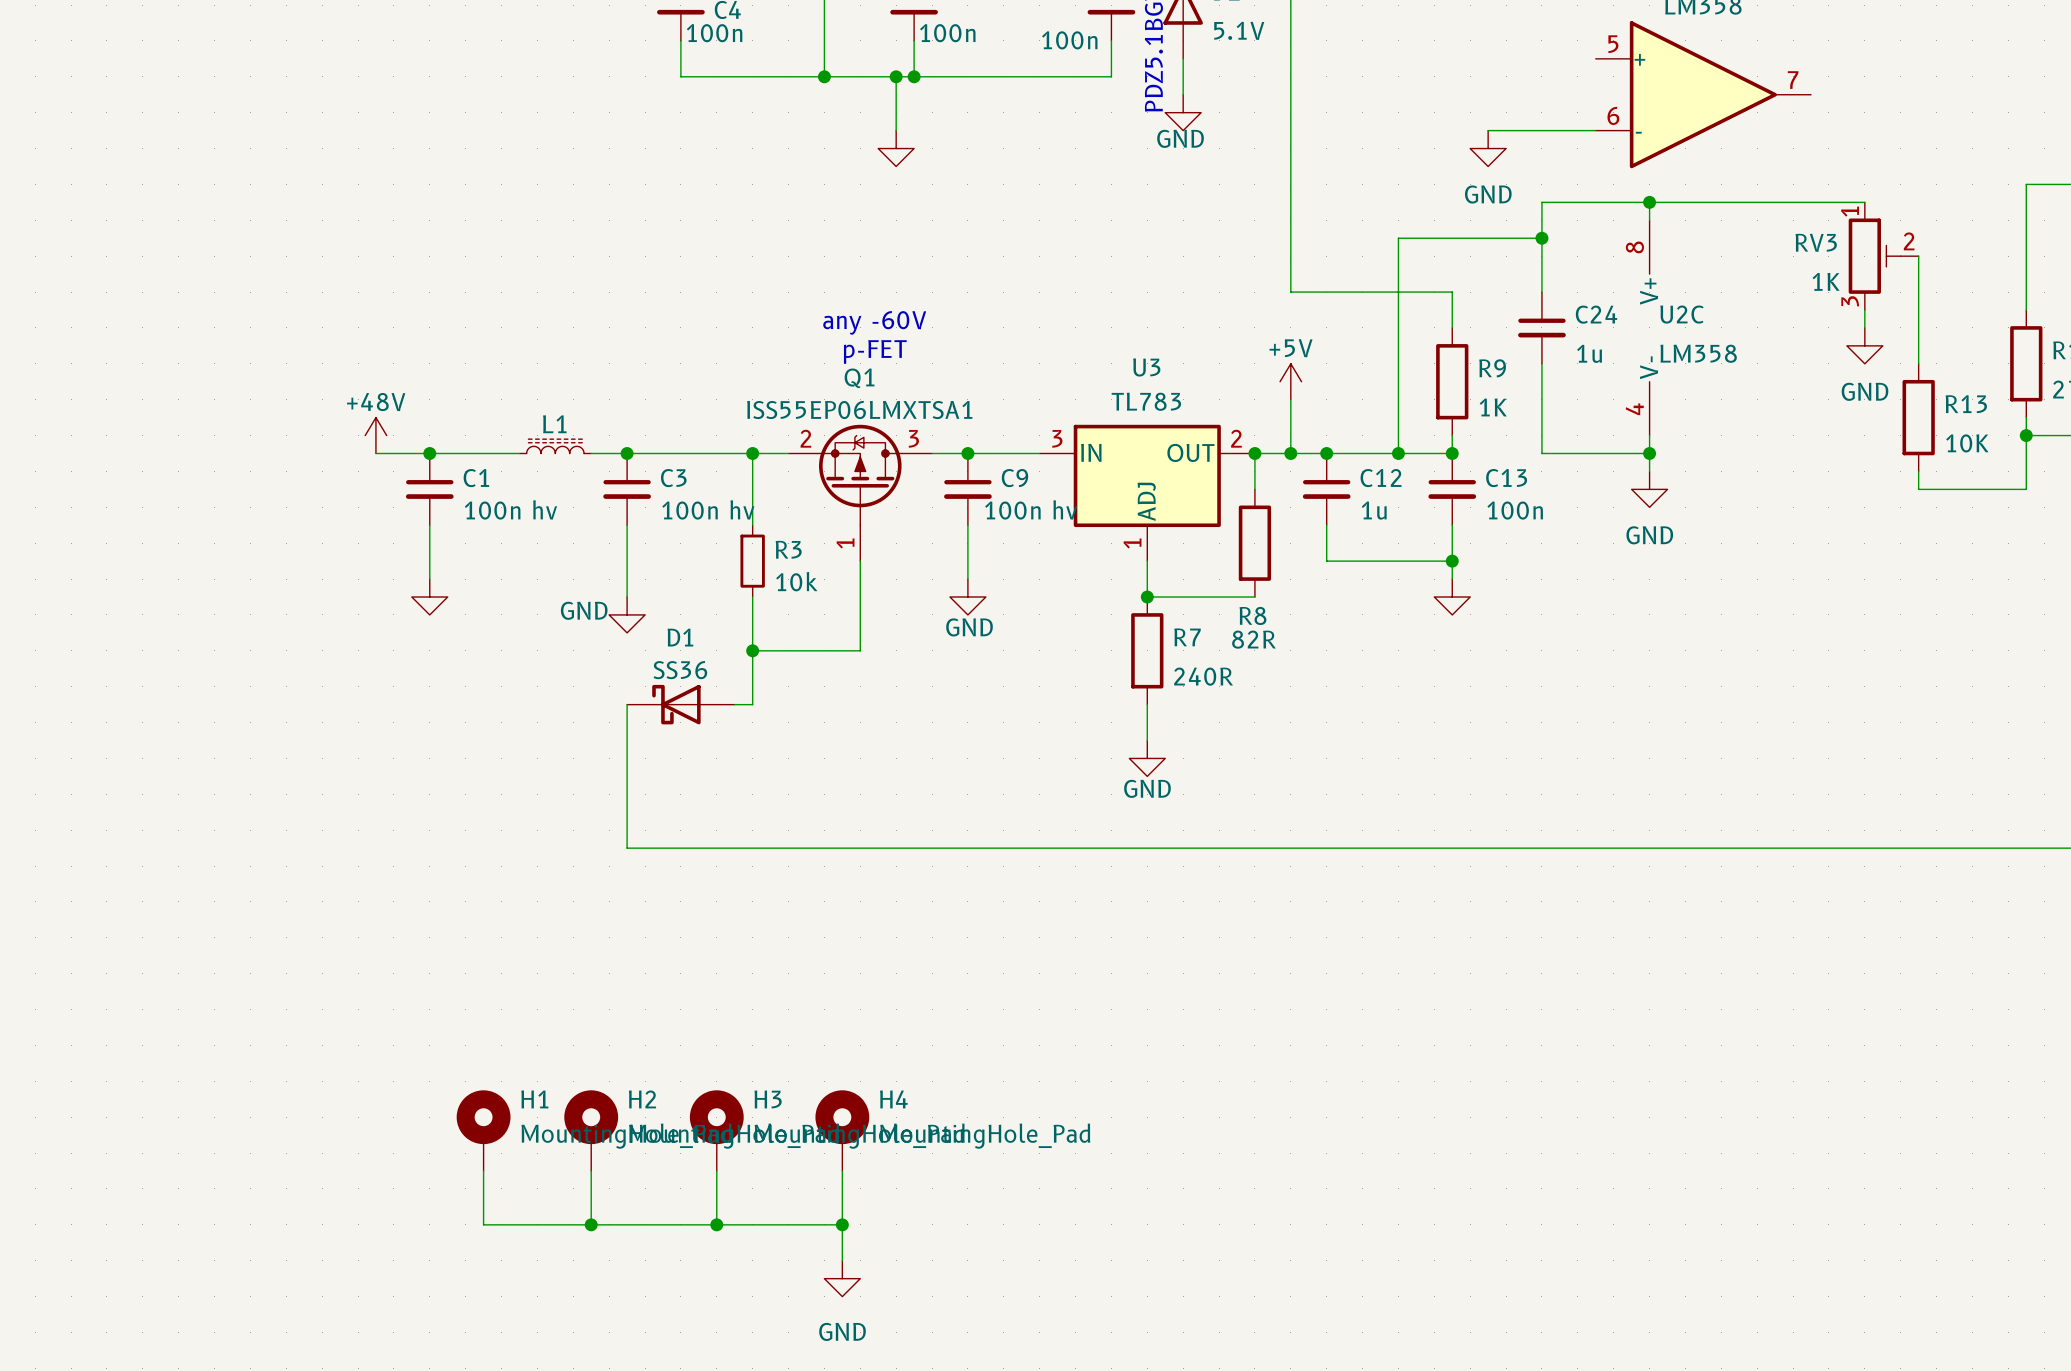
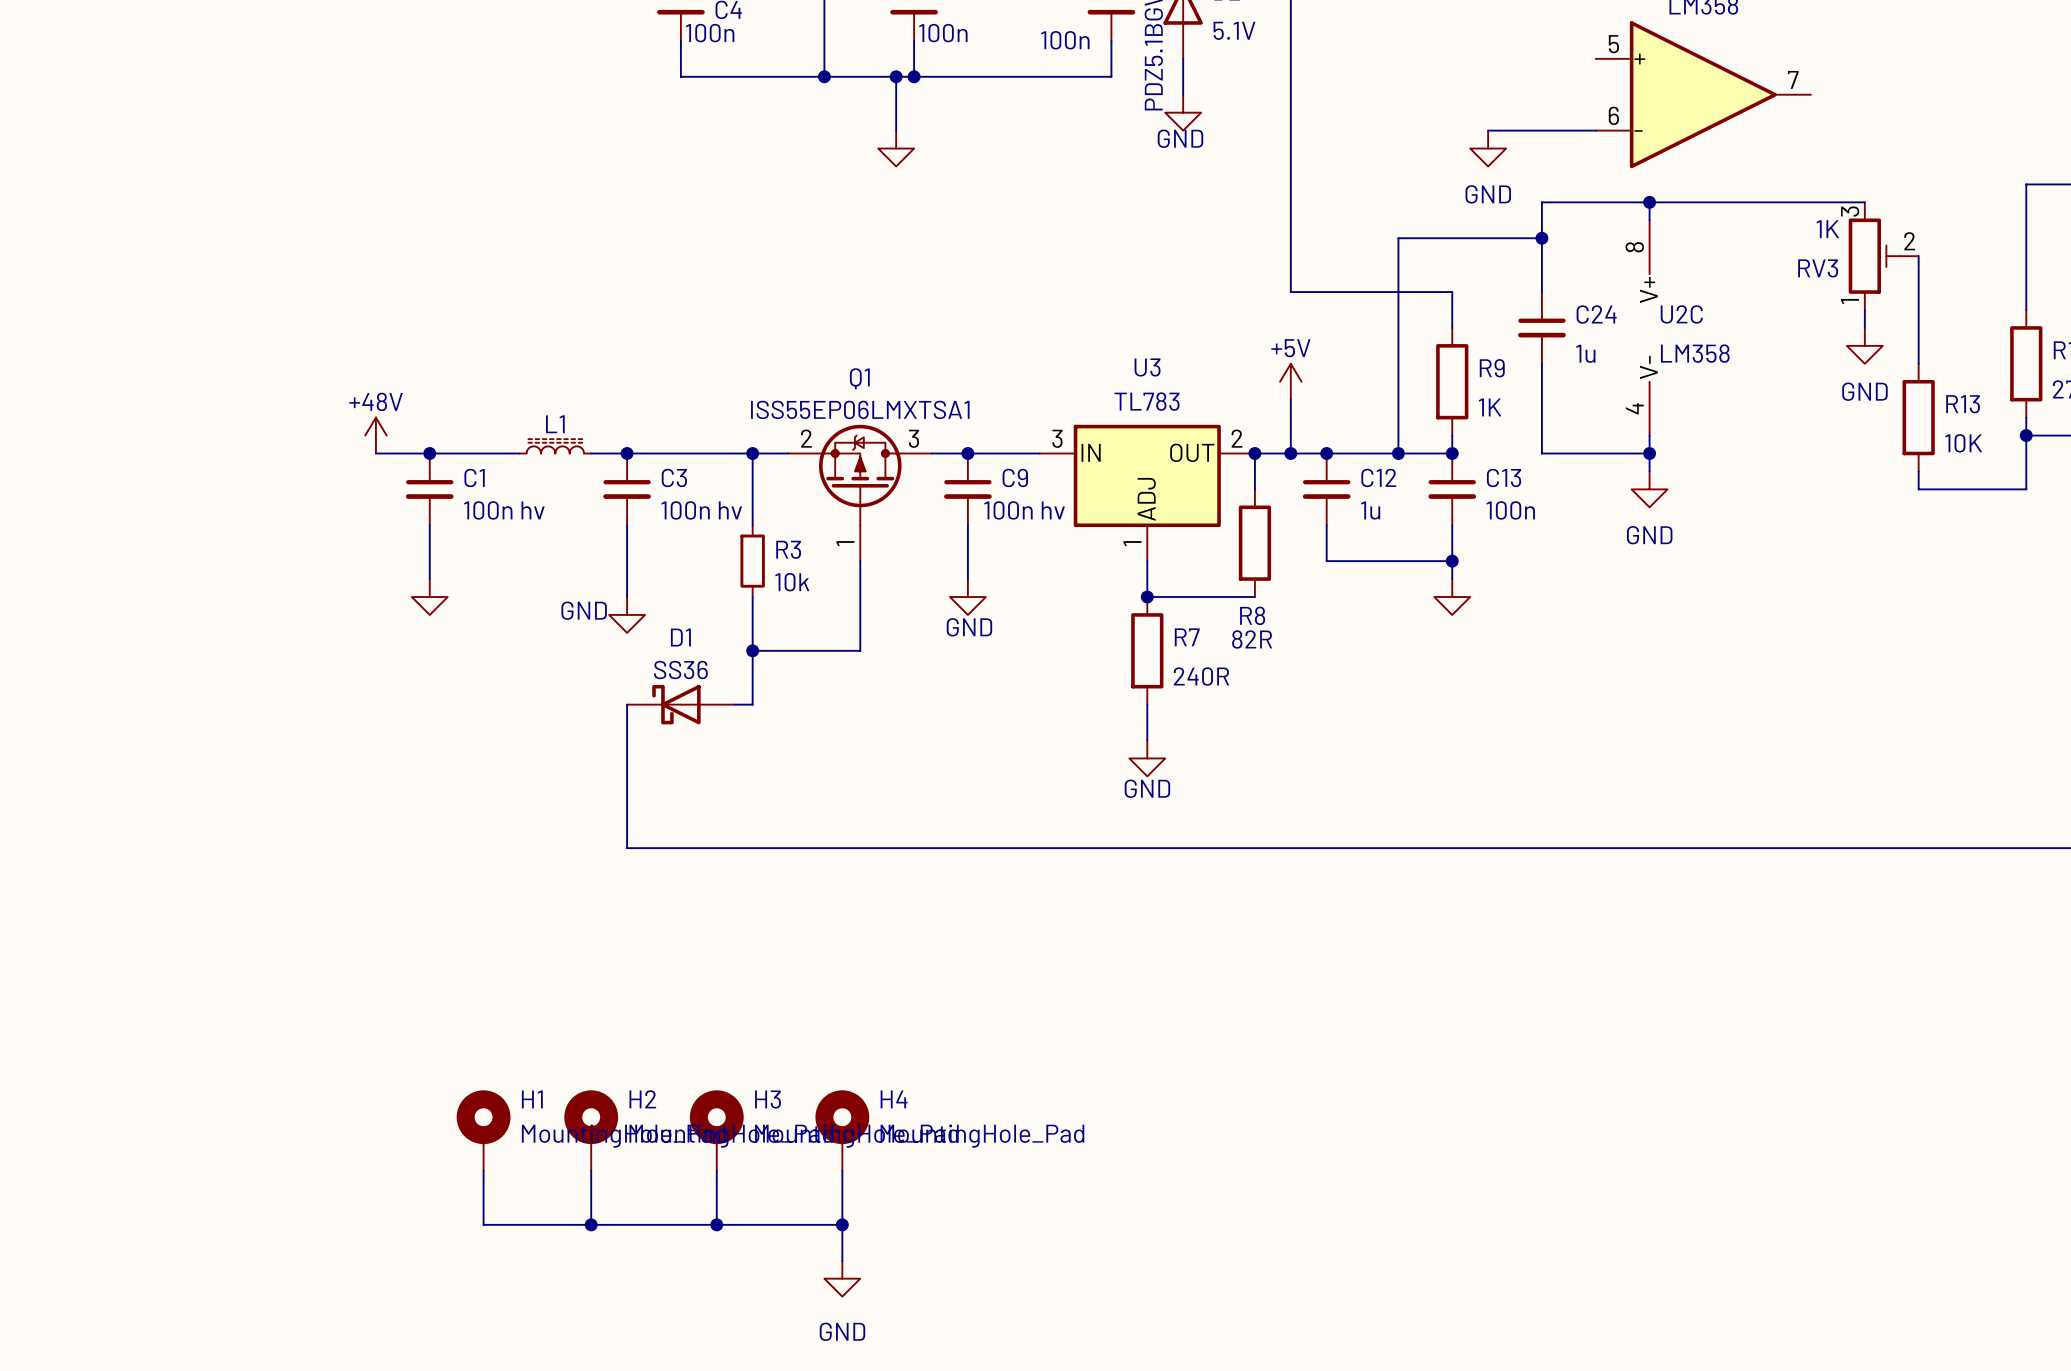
RV3 flip: as is (1874, 256) -> up-down (1874, 256)
text: any -60V (874, 322) -> none
text: p-FET (875, 352) -> none

